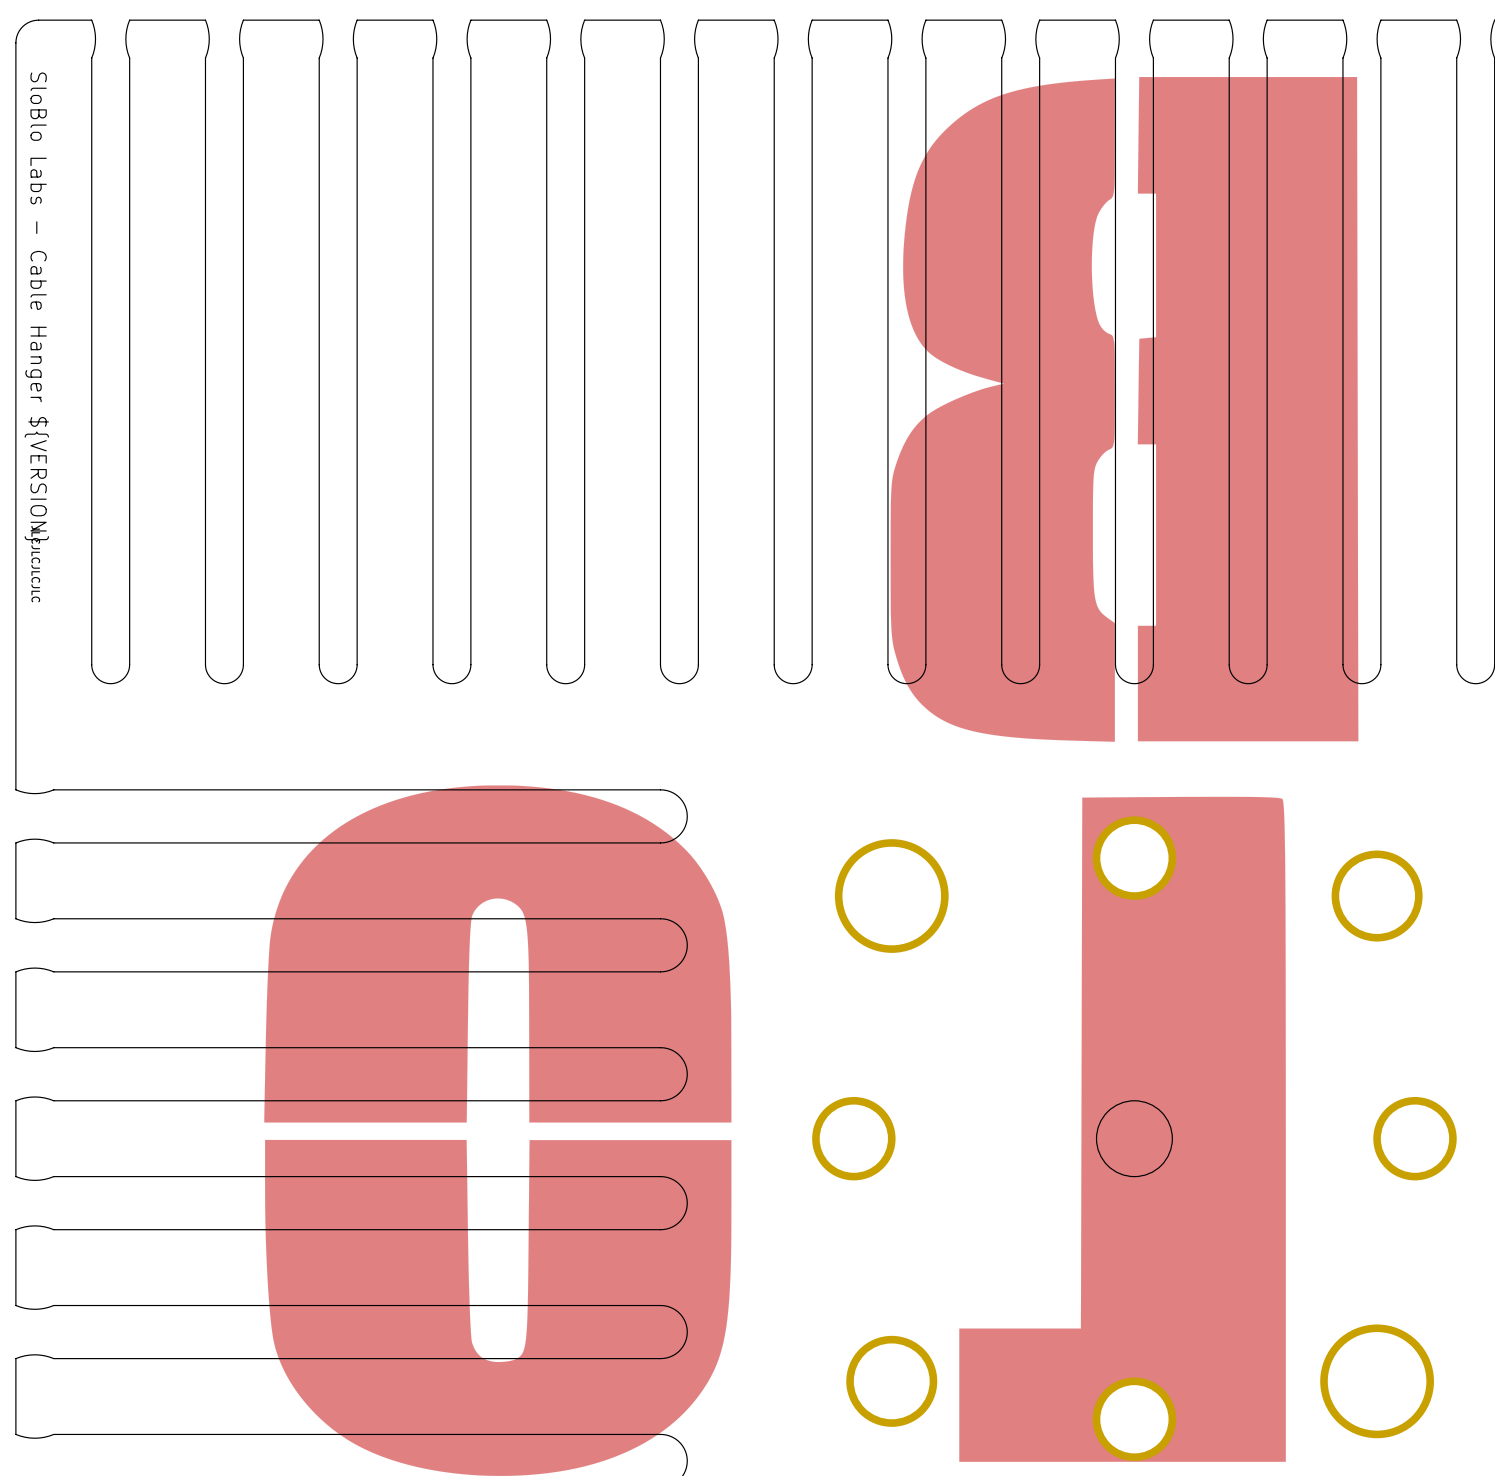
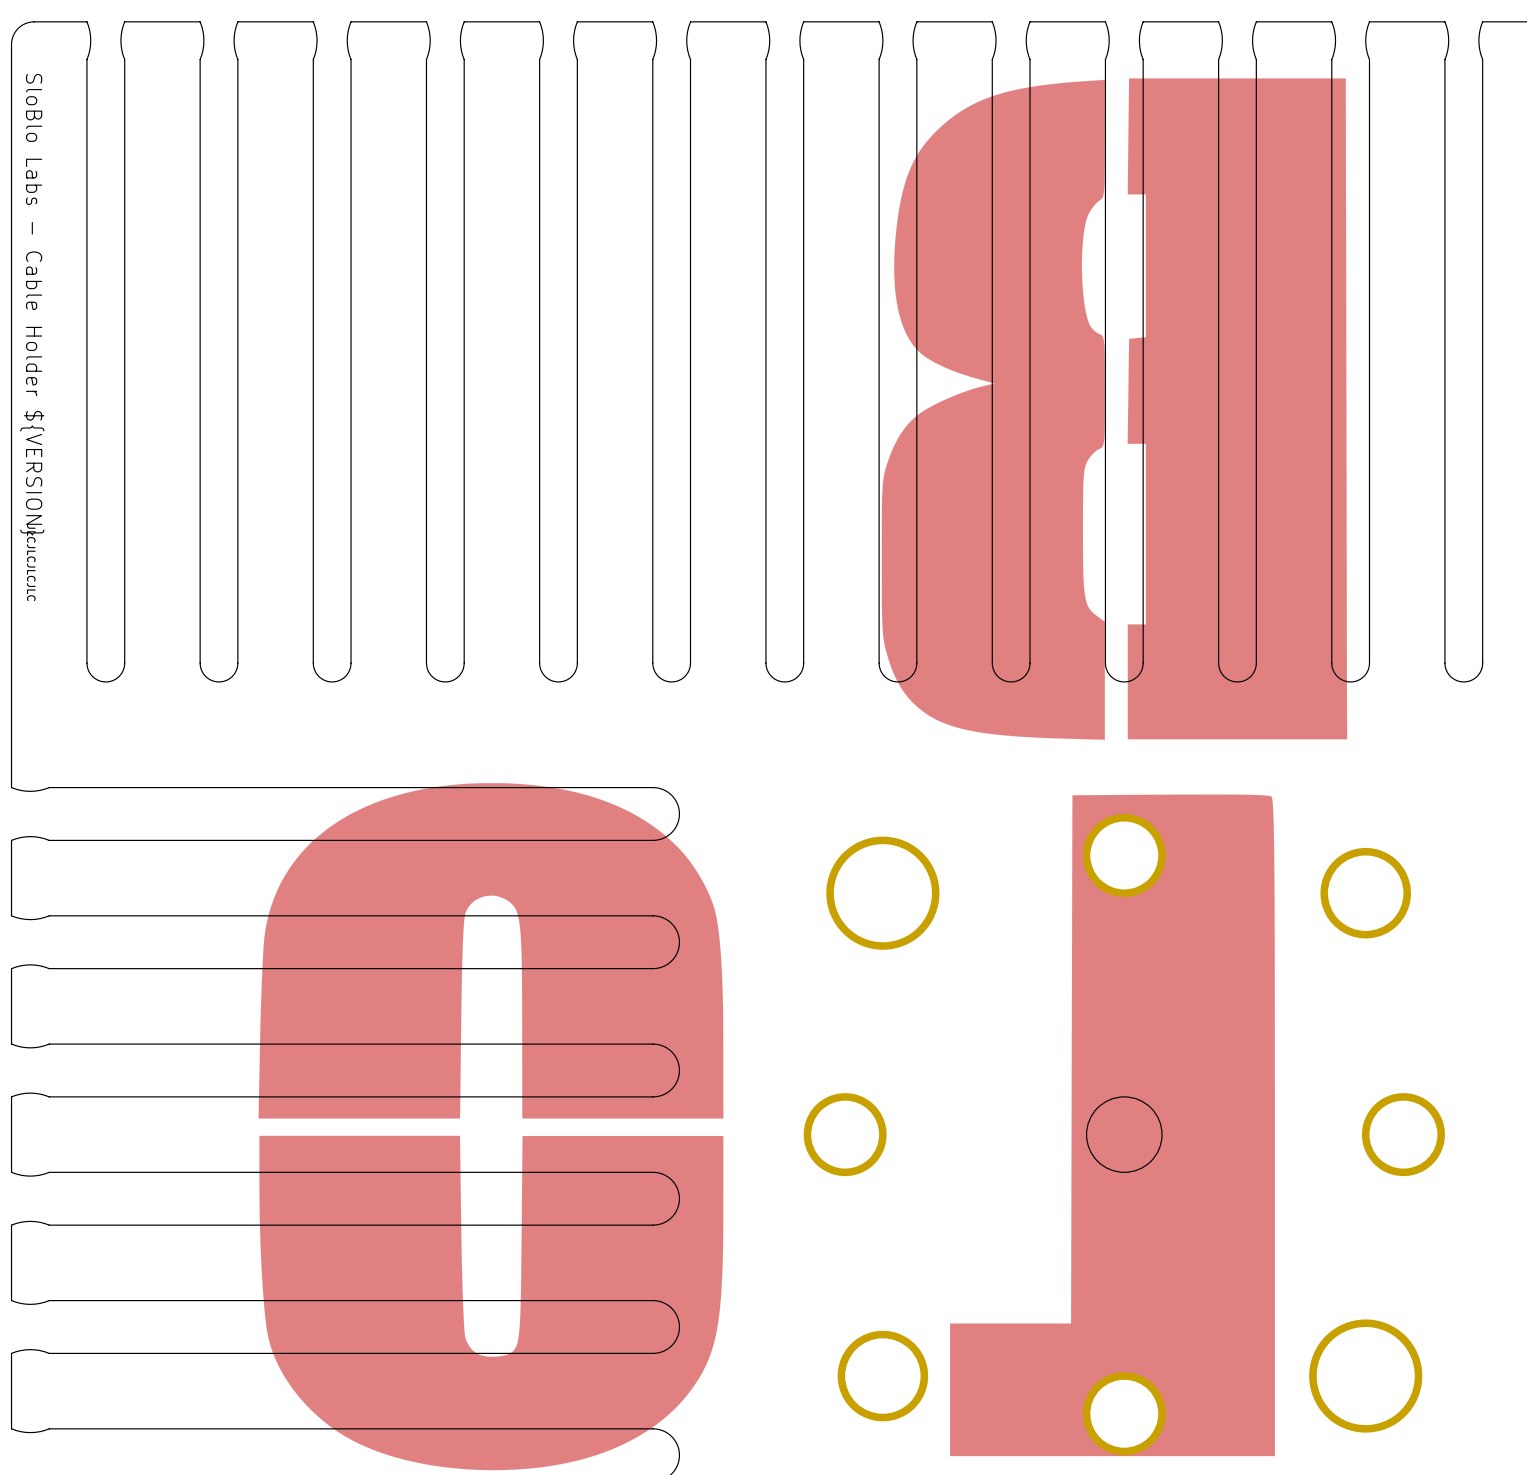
text: SloBlo Labs - Cable Hanger ${VERSION} (36, 307) -> SloBlo Labs - Cable Holder ${VERSION} (32, 304)

